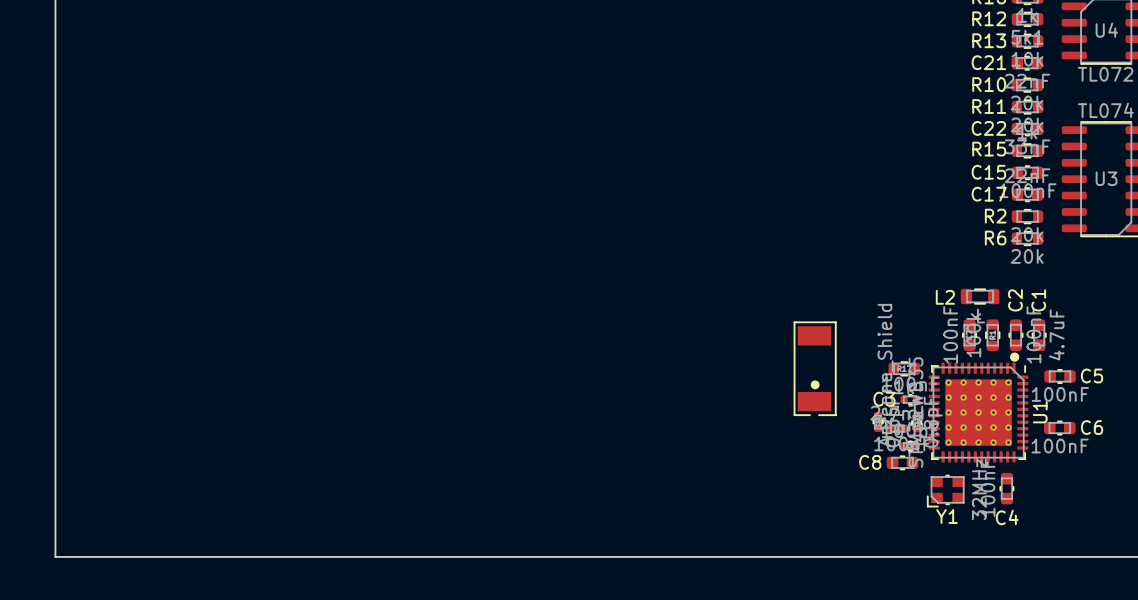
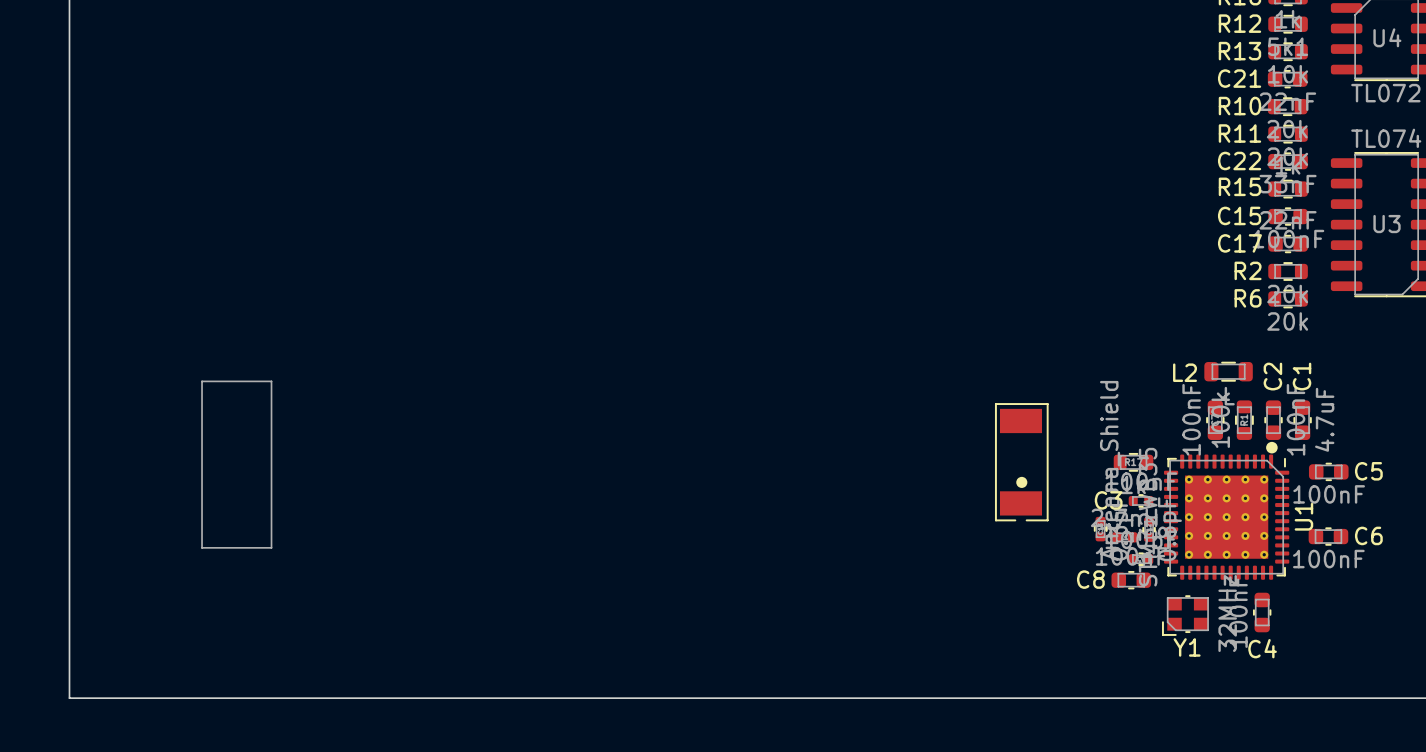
line: none -> (202, 381) (271, 381) (271, 547) (202, 547) (202, 381)

